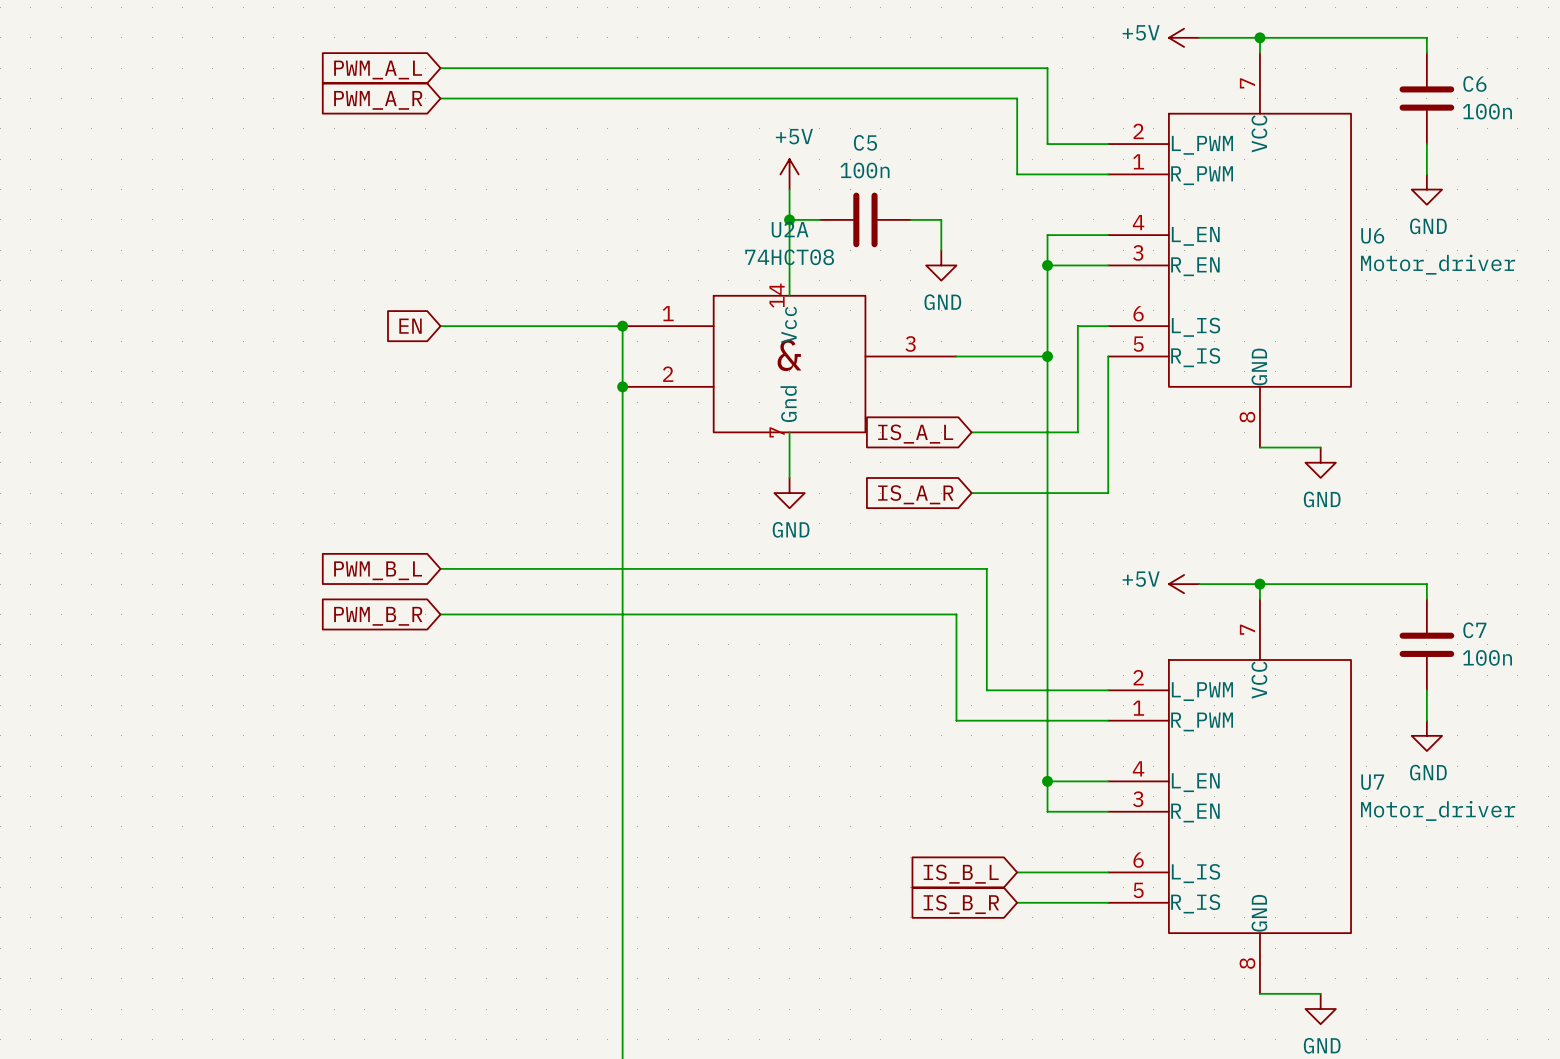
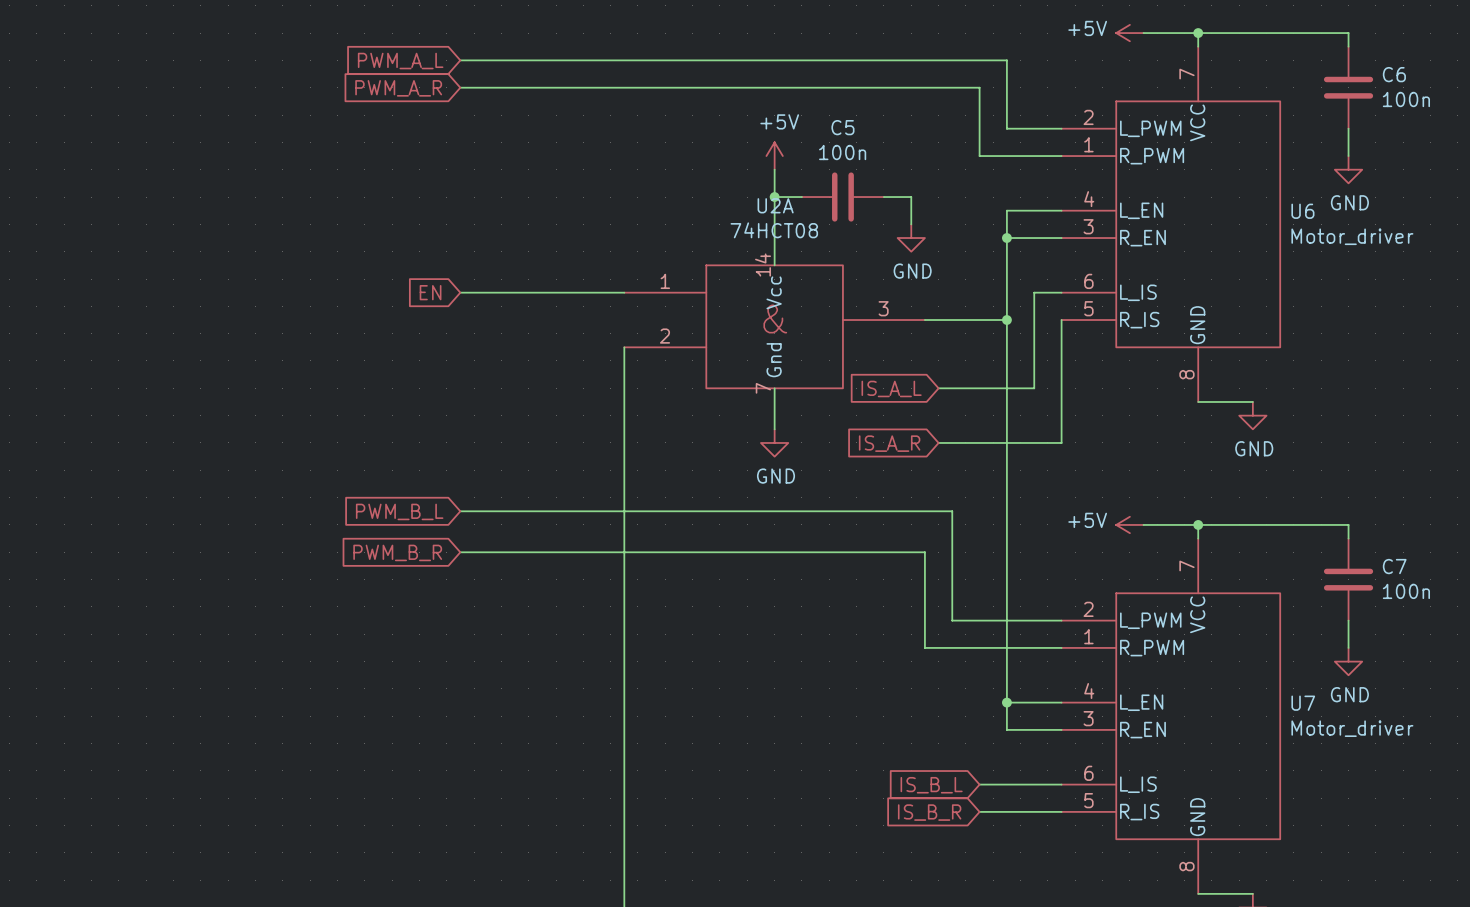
wire: (622, 326) (622, 386) -> none
junction: (622, 326) -> none
junction: (622, 386) -> none

